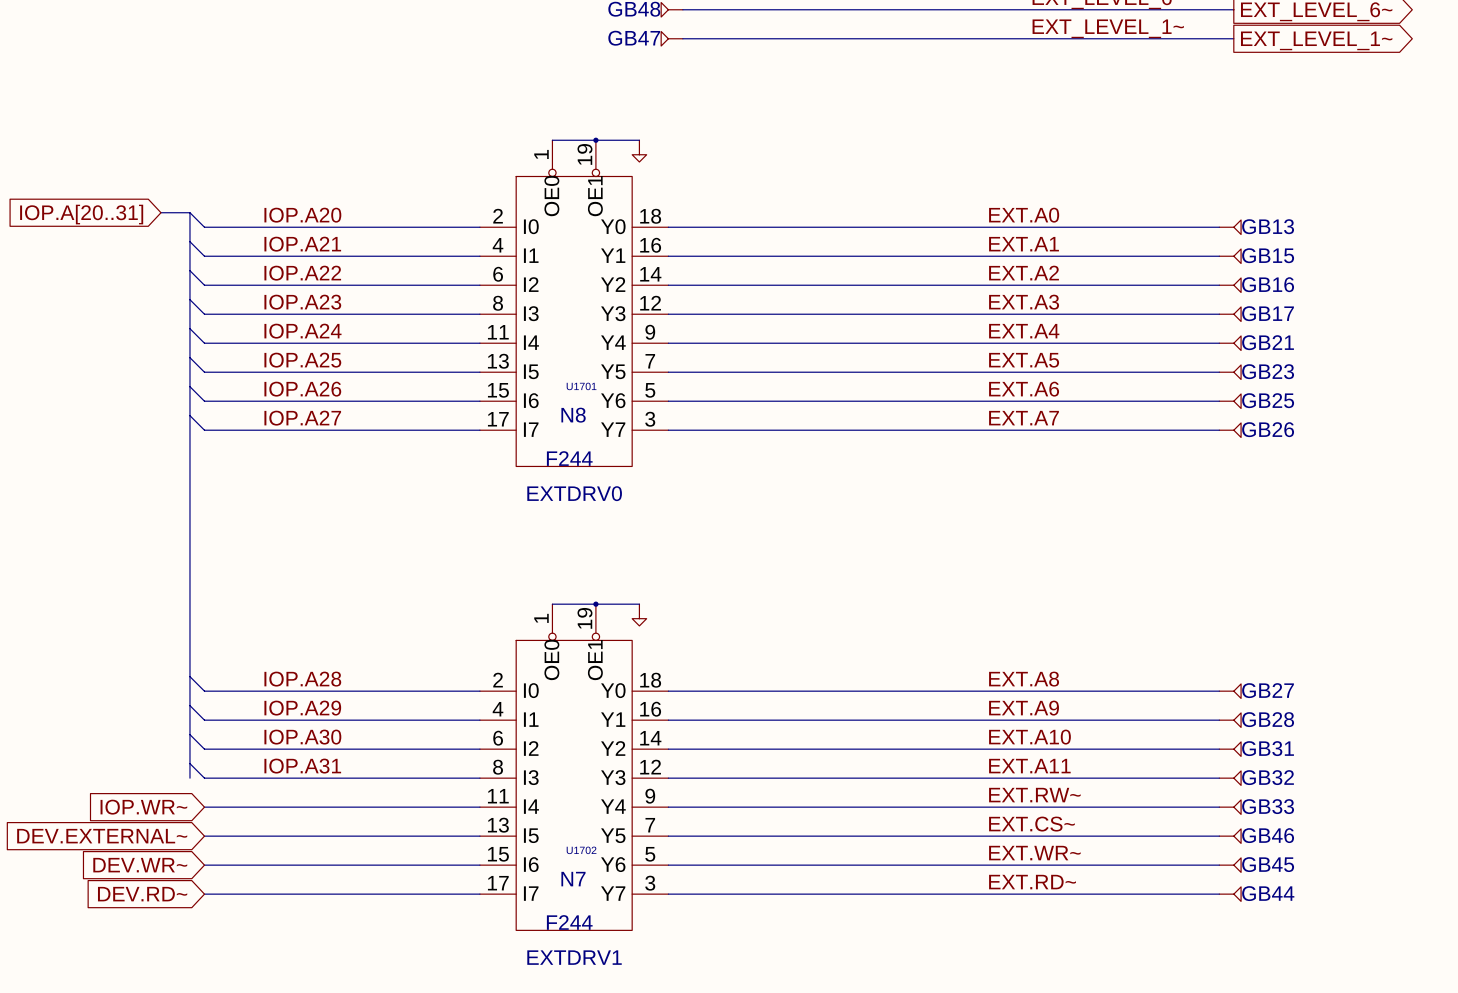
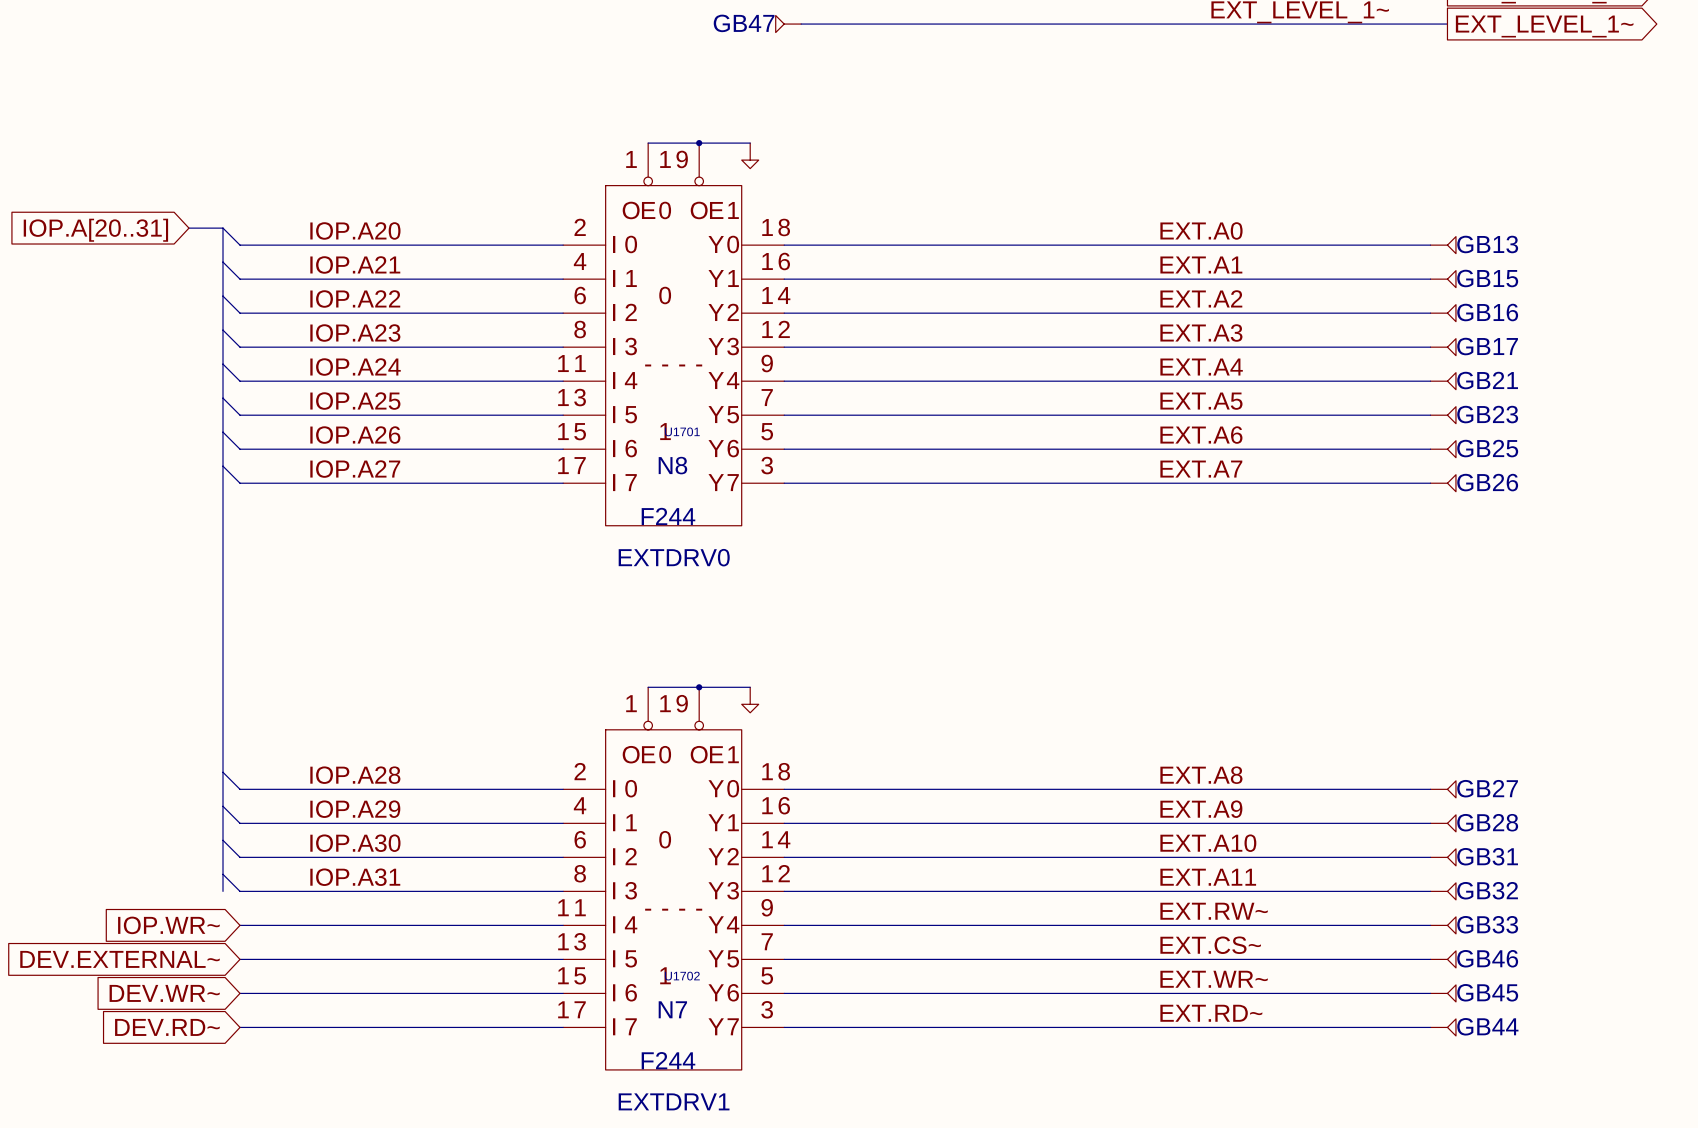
U1701 symbol: [479, 140, 669, 467] -> [563, 143, 785, 526]
U1702 symbol: [479, 604, 669, 931] -> [563, 687, 785, 1070]

